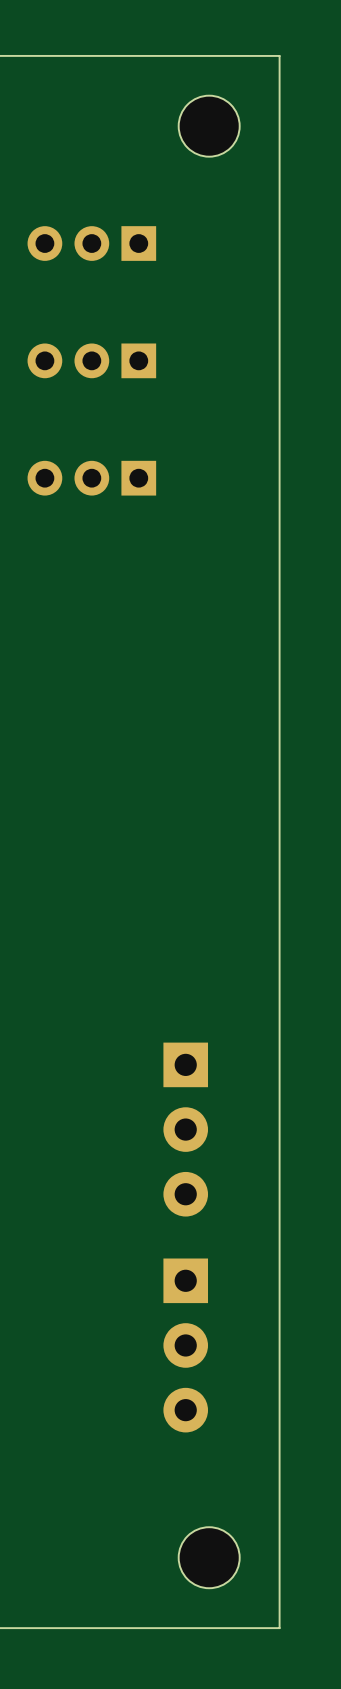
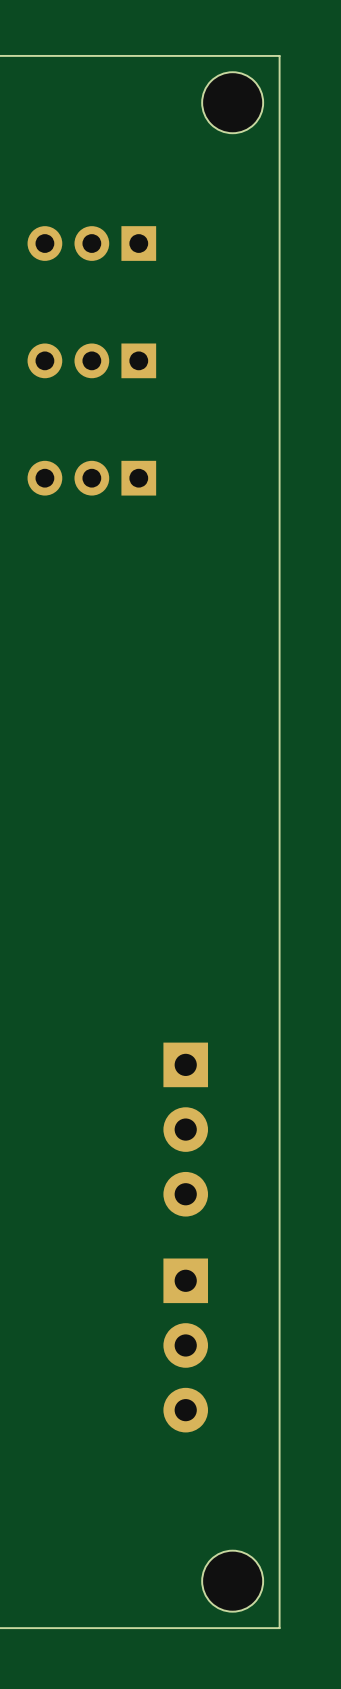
part position: (209, 126) -> (232, 102)
part position: (209, 1557) -> (232, 1581)

